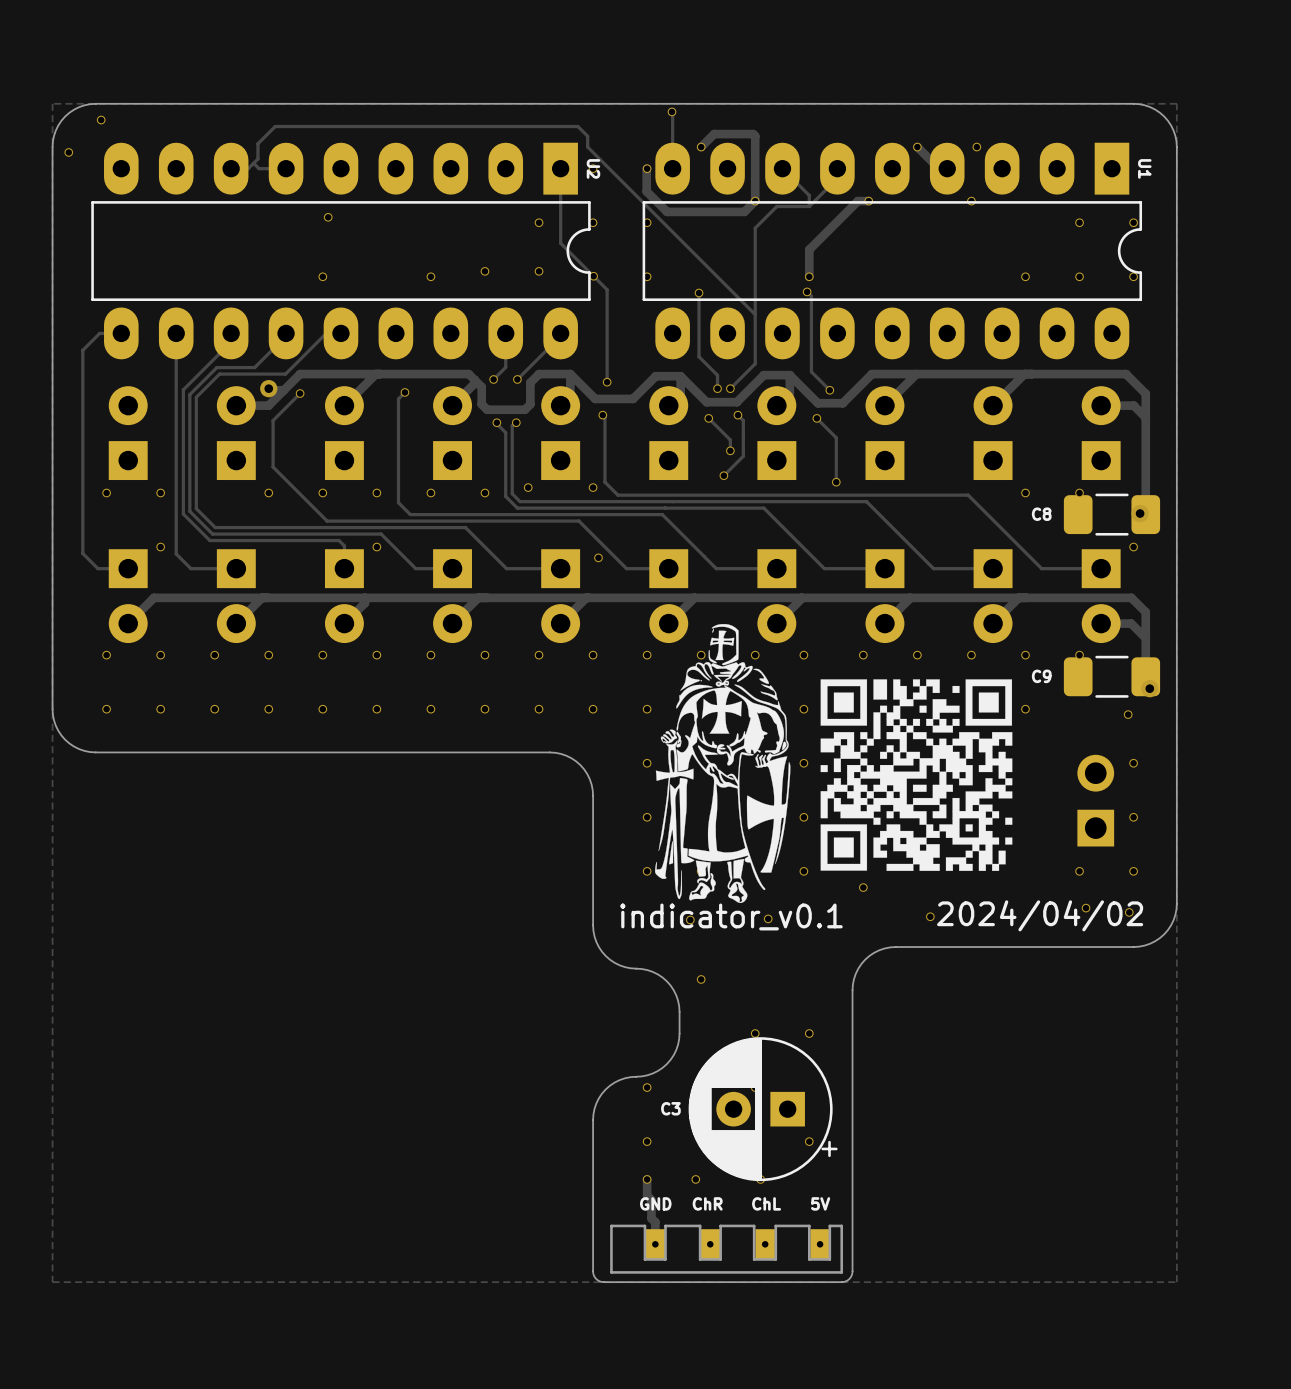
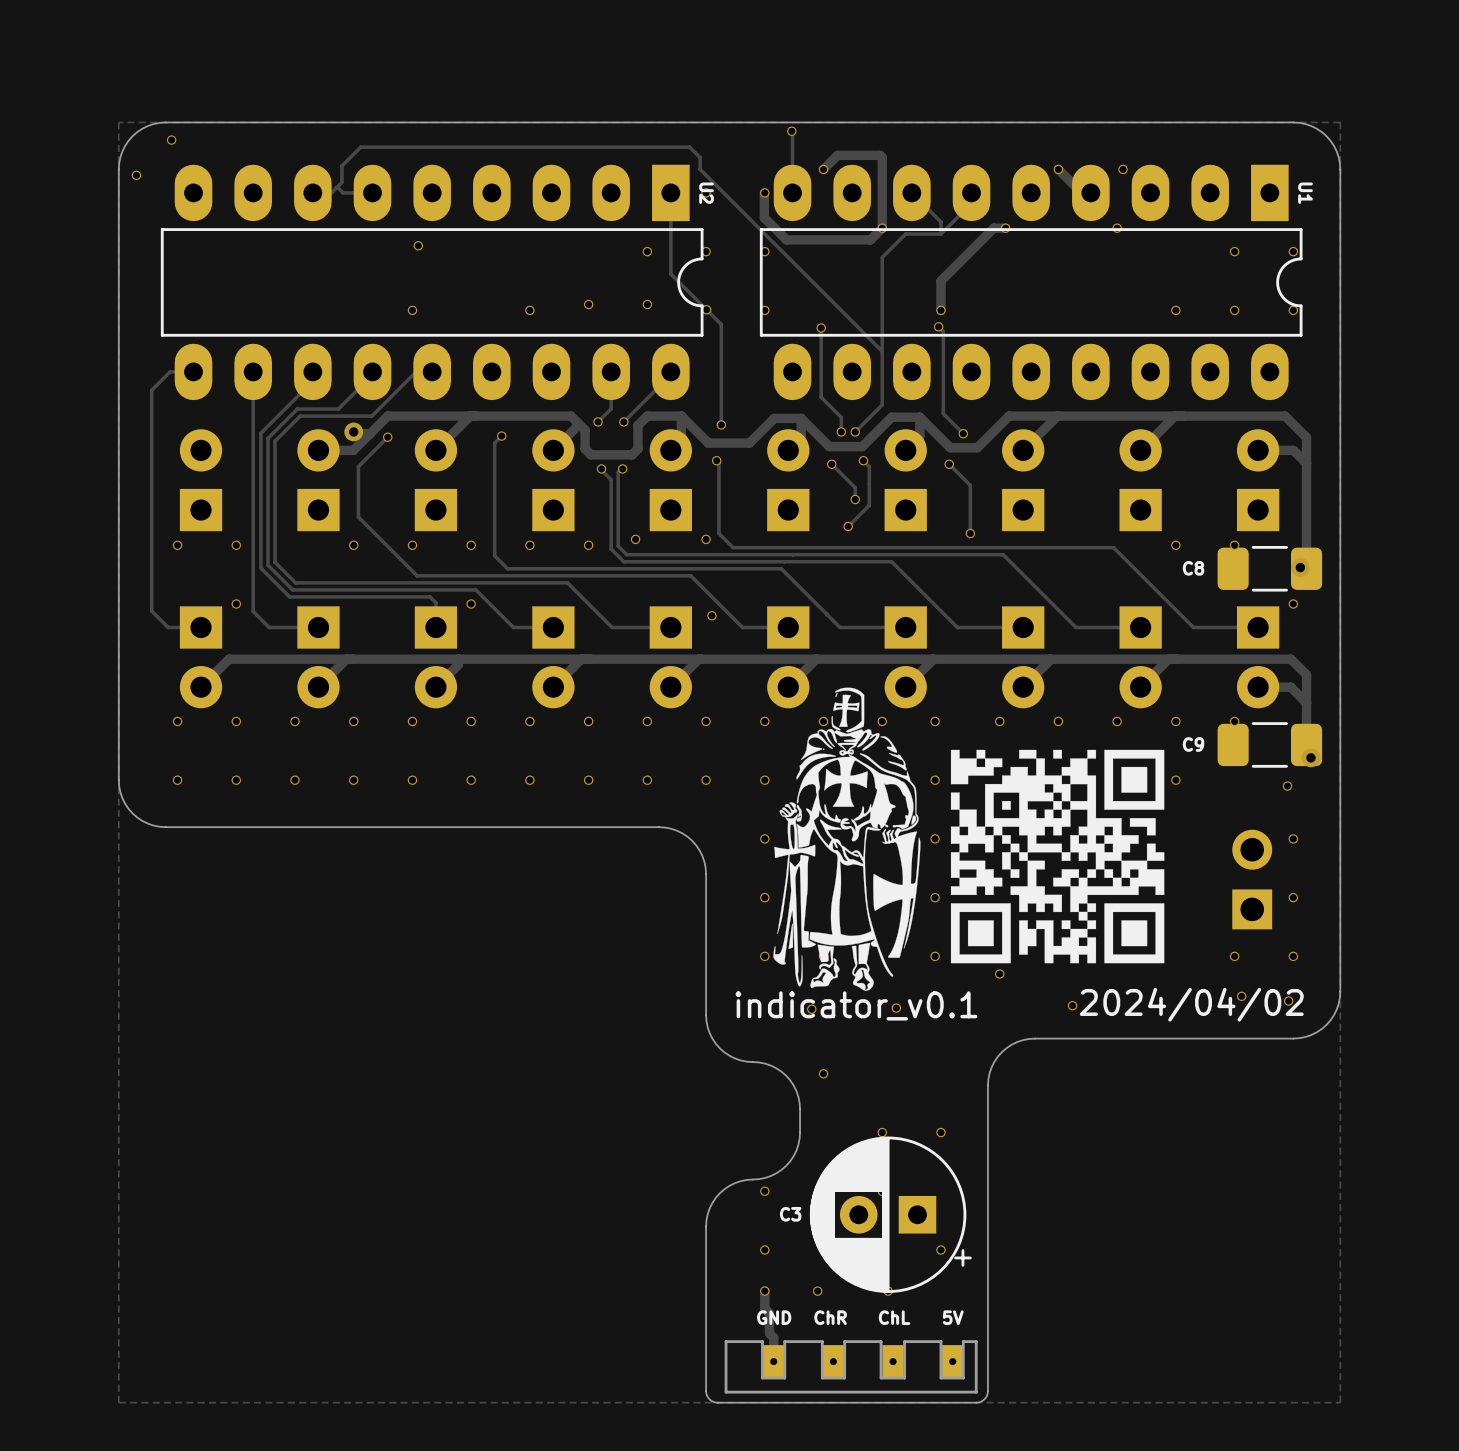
drawing shape: [820, 679, 1013, 871] -> [950, 749, 1165, 964]

